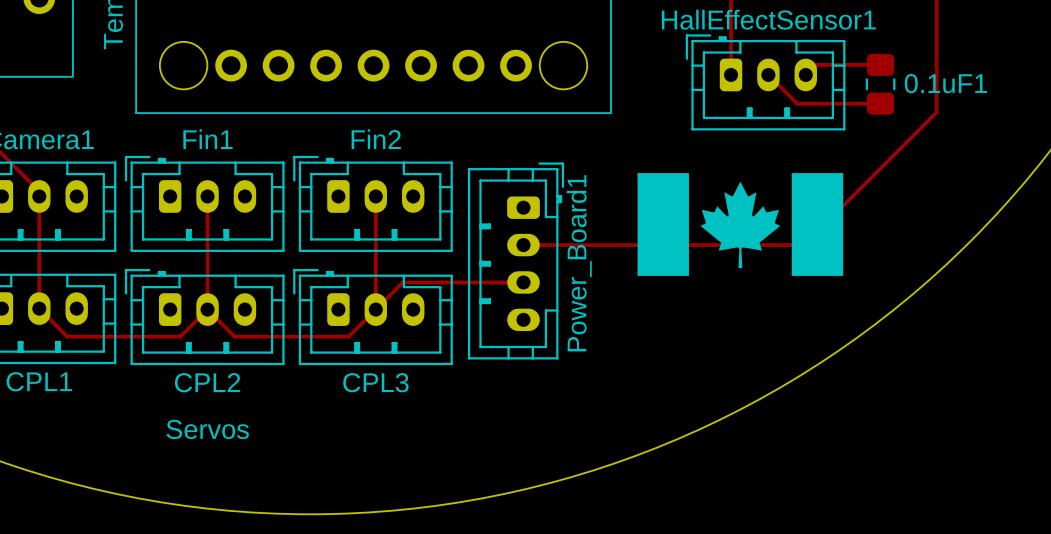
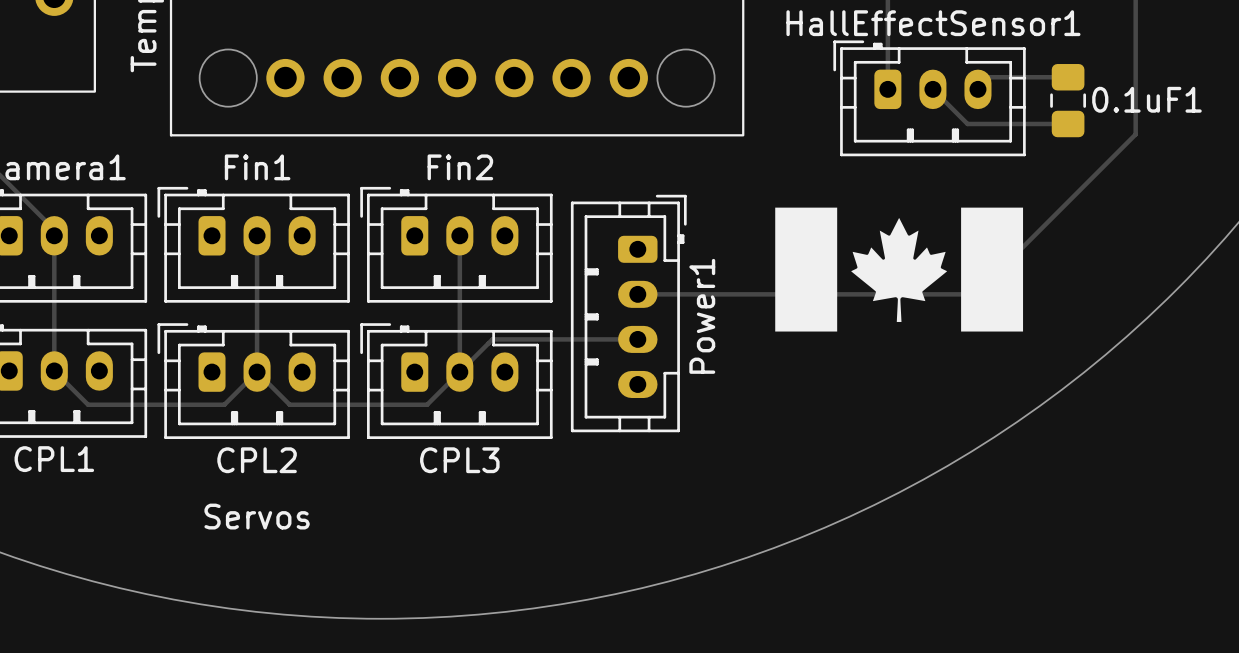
Power_Board1 name: Power_Board1 (579, 263) -> Power1 (702, 316)

